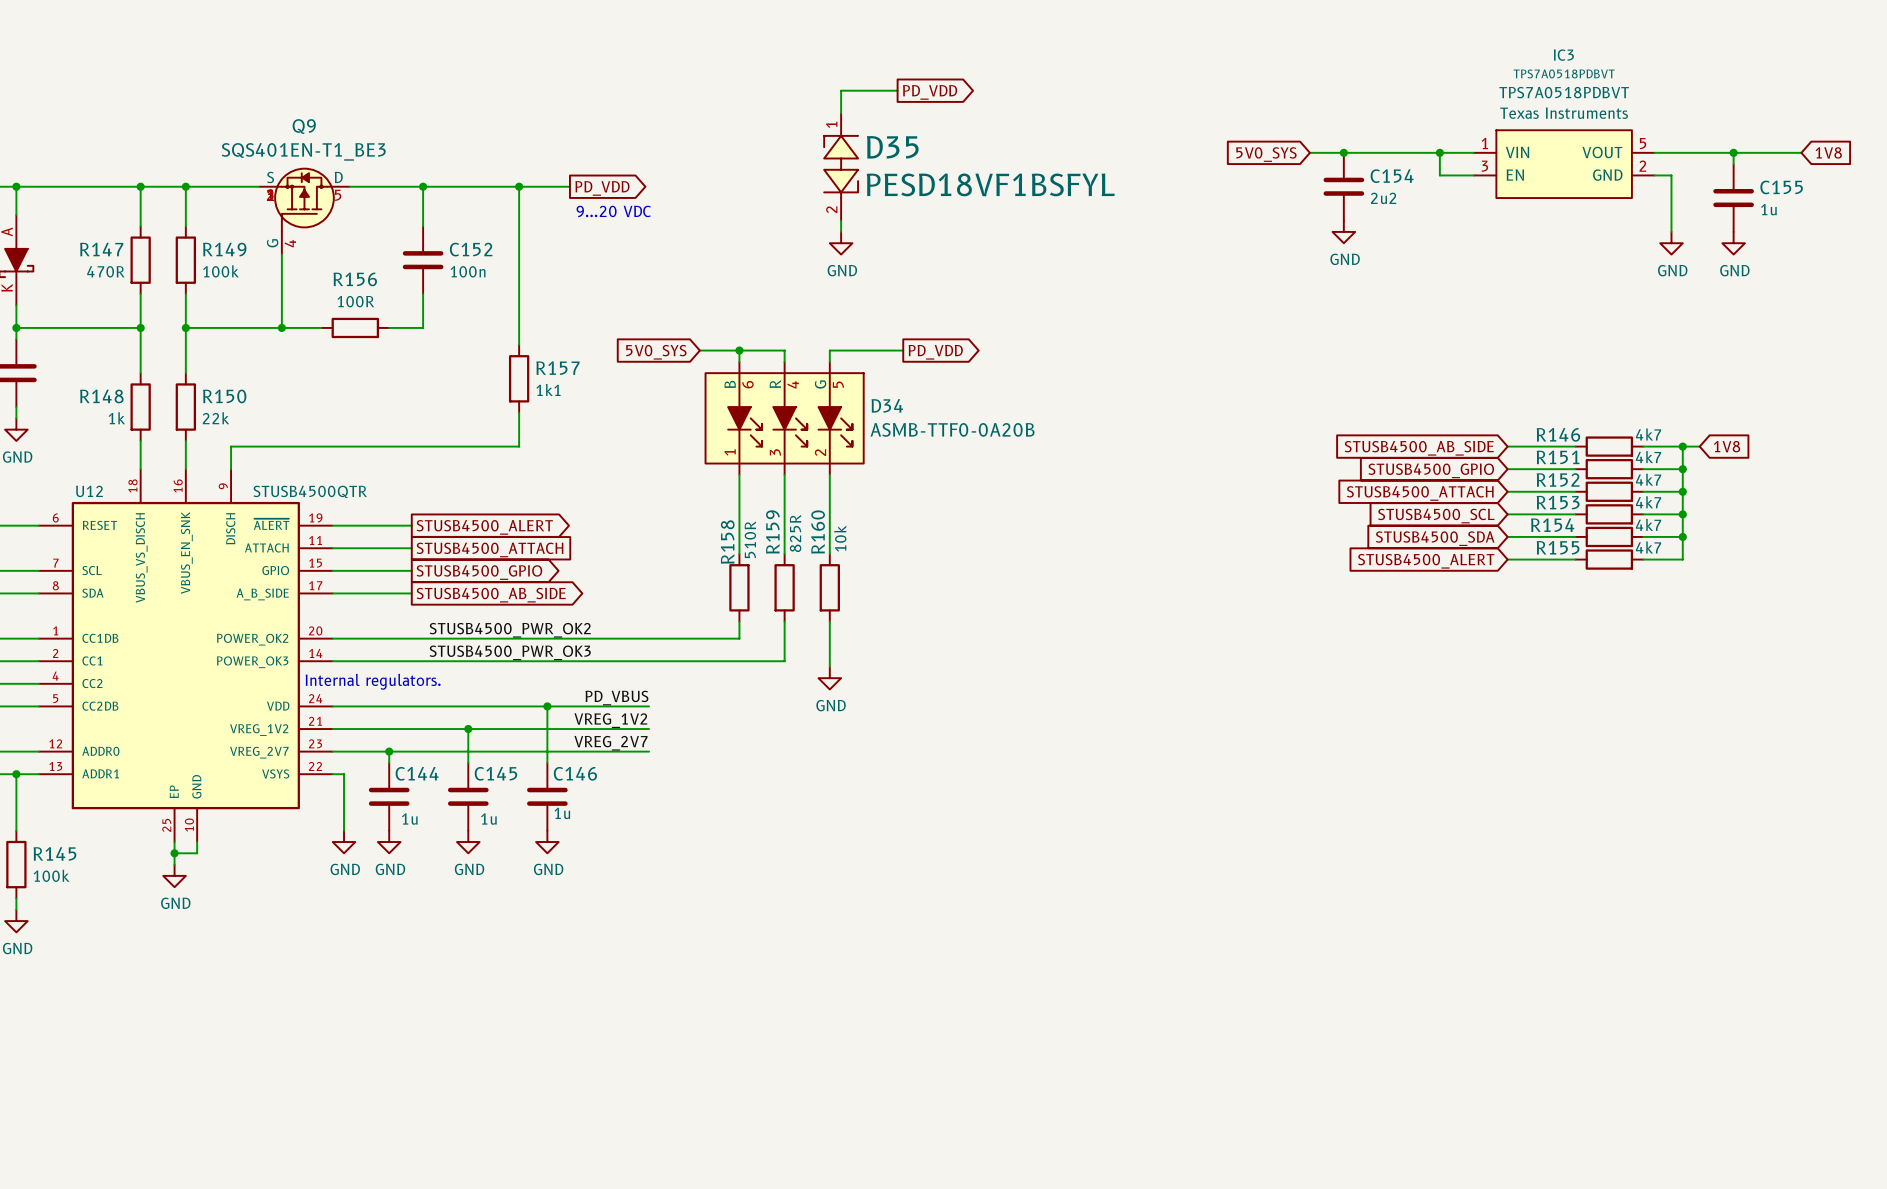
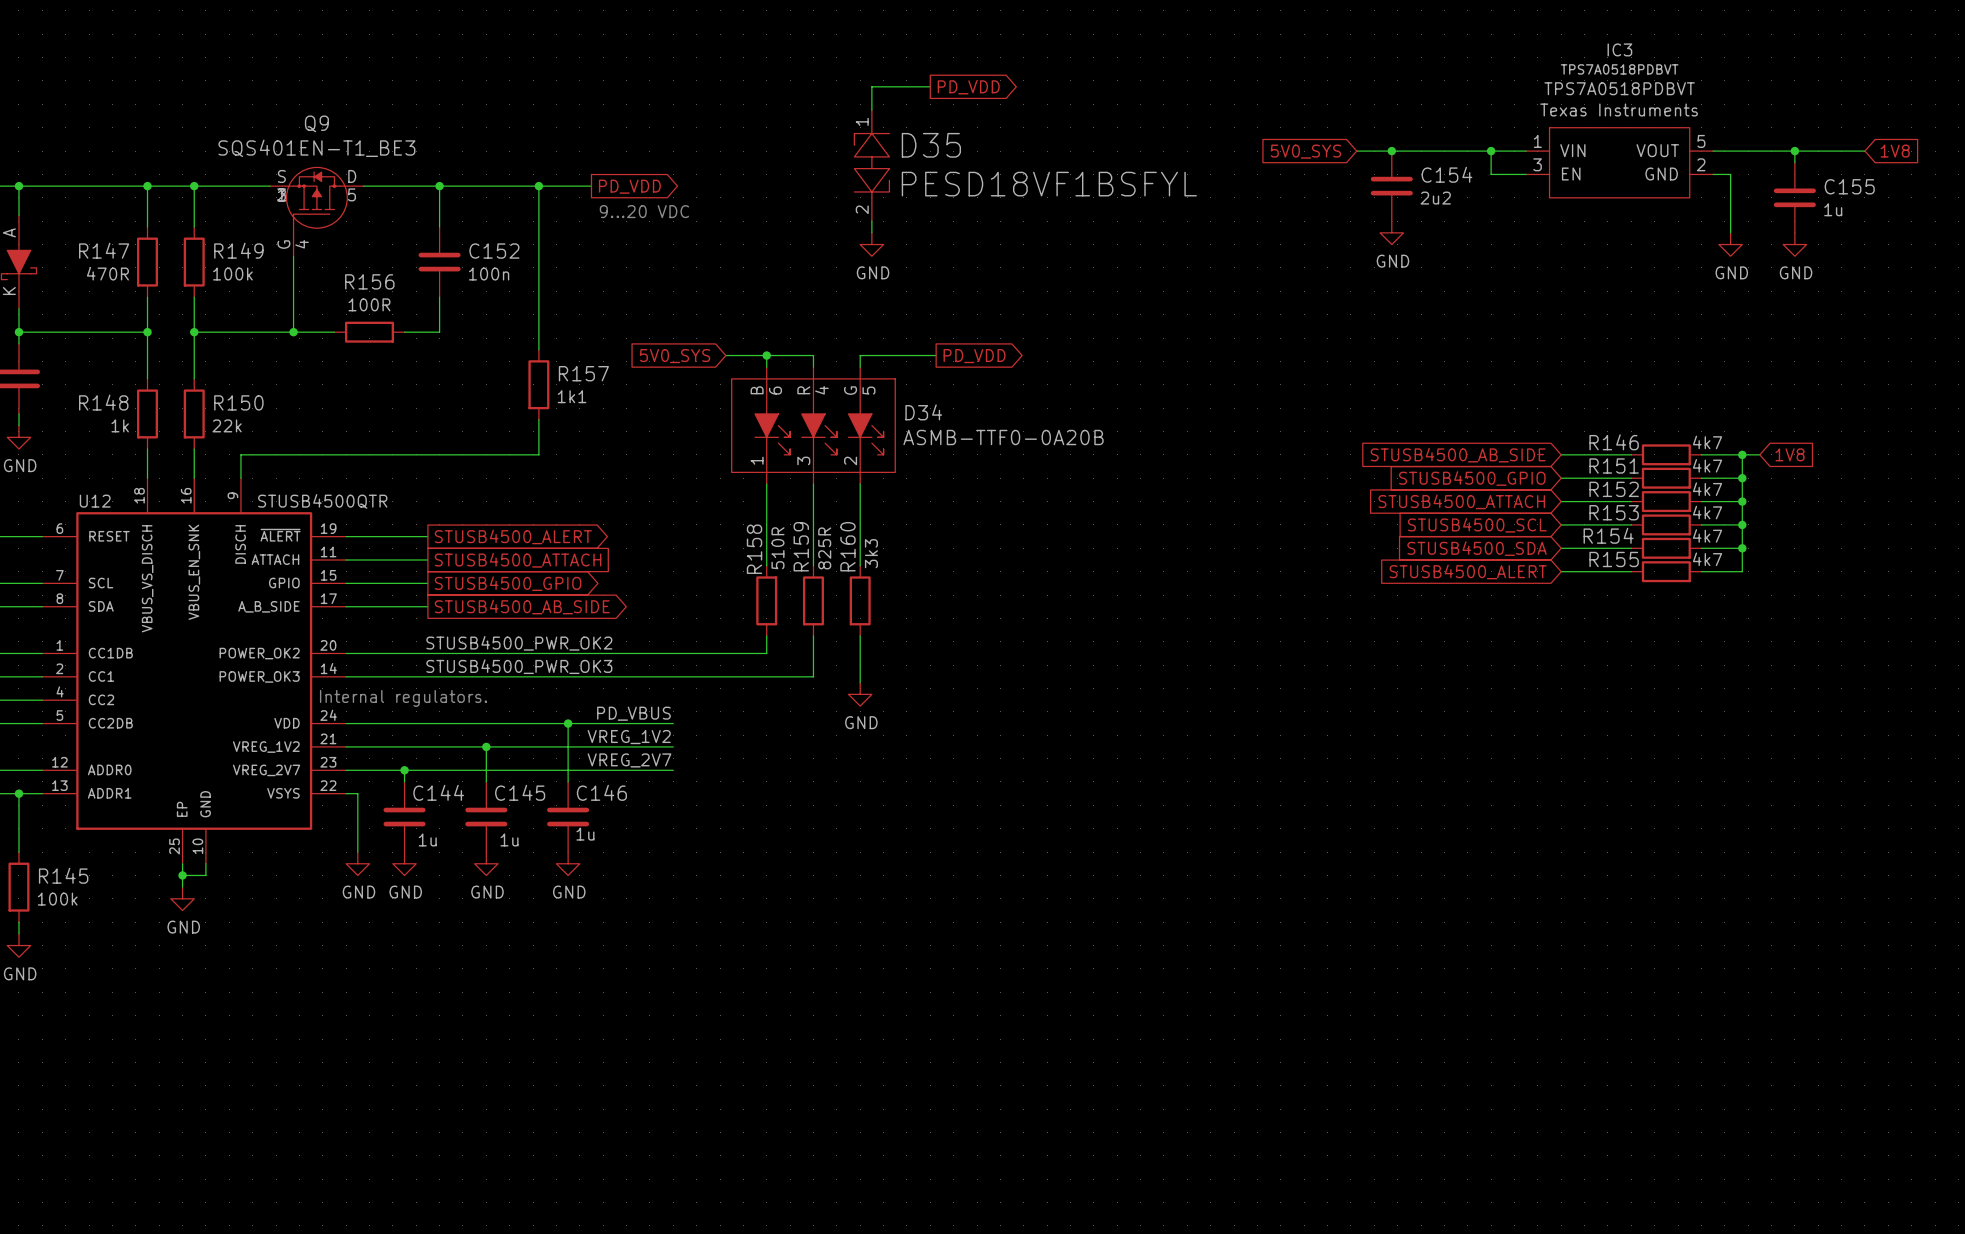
R160 text: 10k (840, 538) -> 3k3 (871, 553)

